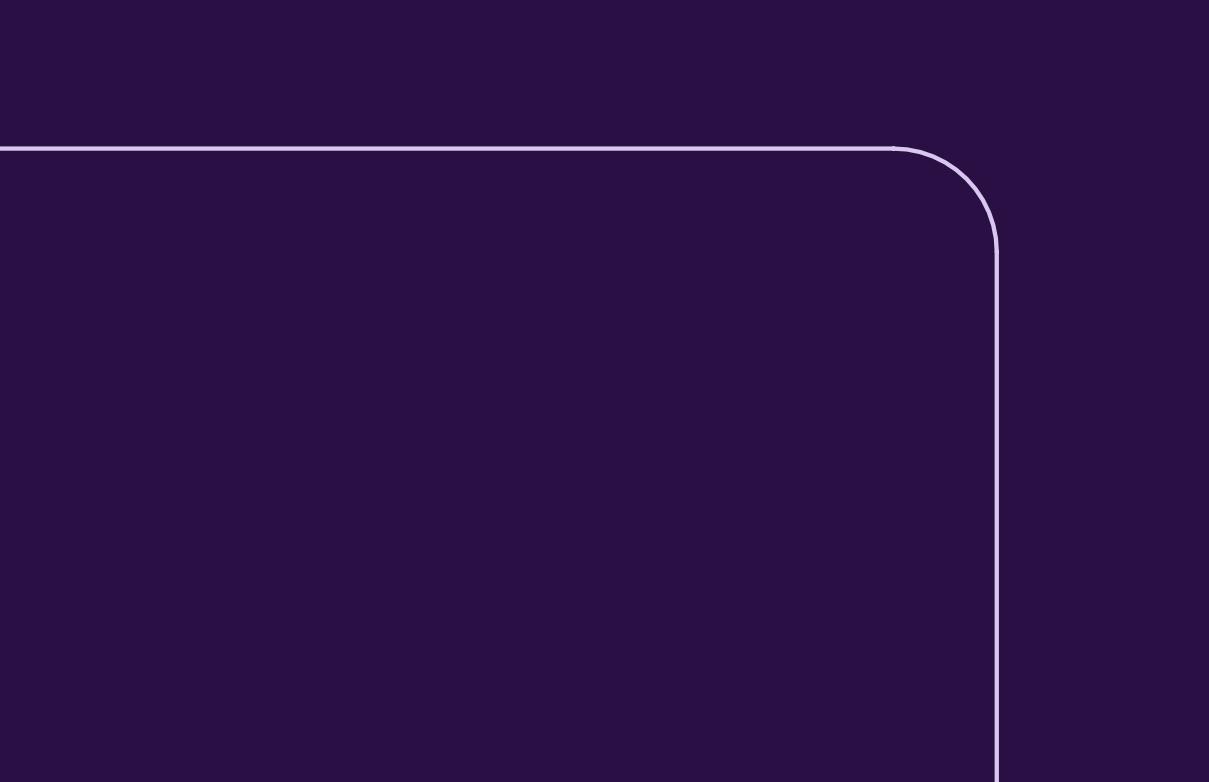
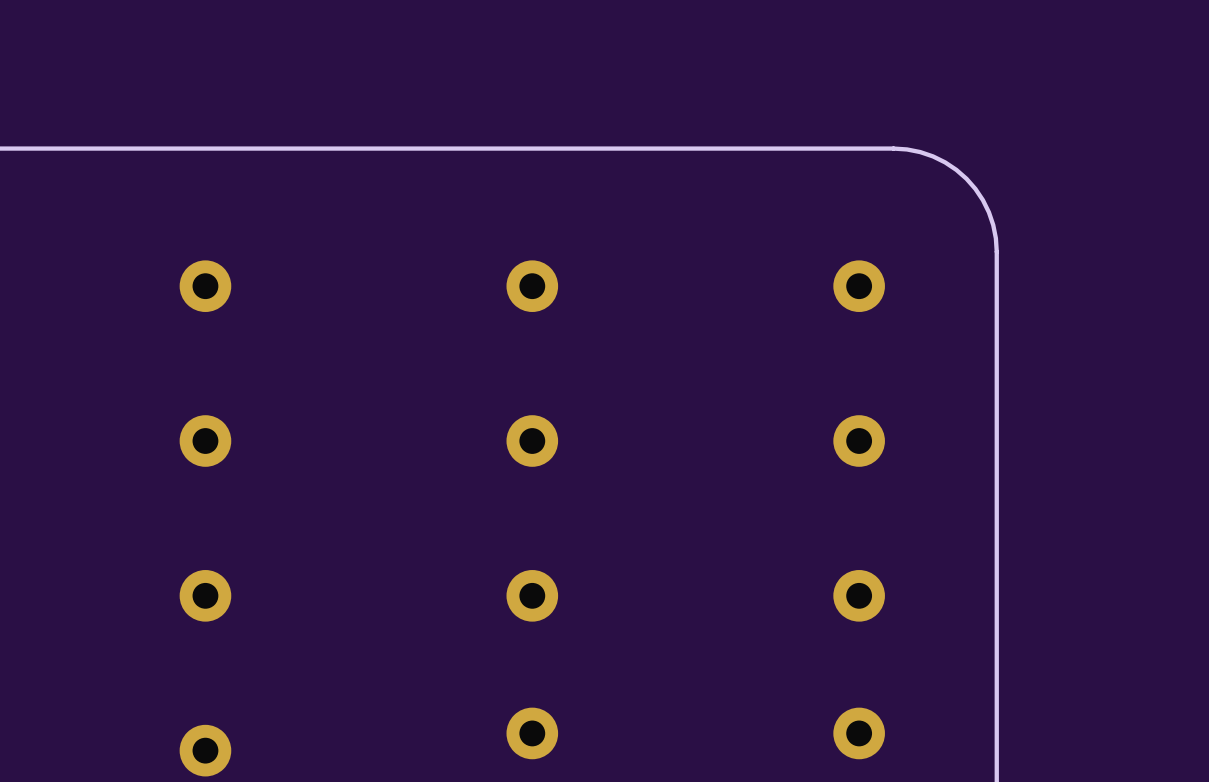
via: none -> (205, 286)
via: none -> (532, 286)
via: none -> (859, 286)
via: none -> (205, 441)
via: none -> (532, 441)
via: none -> (859, 441)
via: none -> (205, 595)
via: none -> (532, 595)
via: none -> (859, 595)
via: none -> (532, 733)
via: none -> (859, 733)
via: none -> (205, 750)

